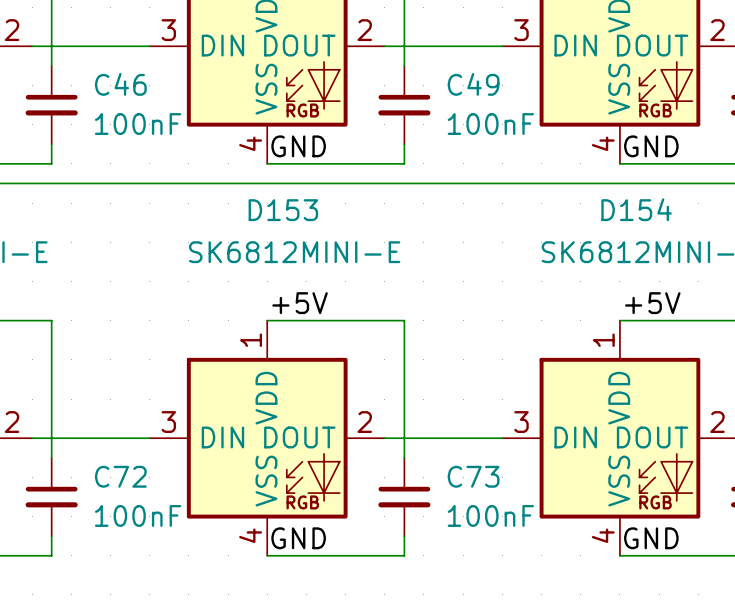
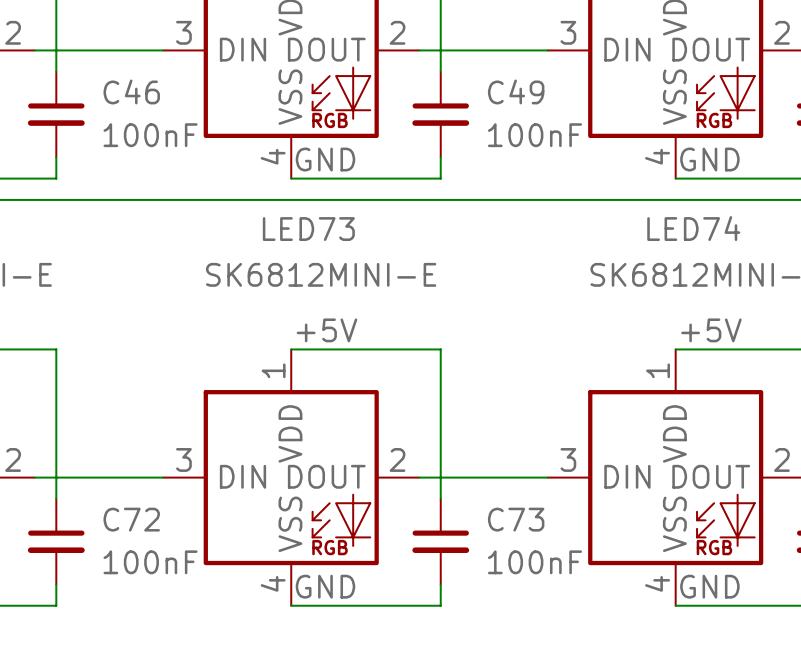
D154 name: D154 (636, 209) -> LED74 (693, 228)
D153 name: D153 (283, 210) -> LED73 (308, 229)

